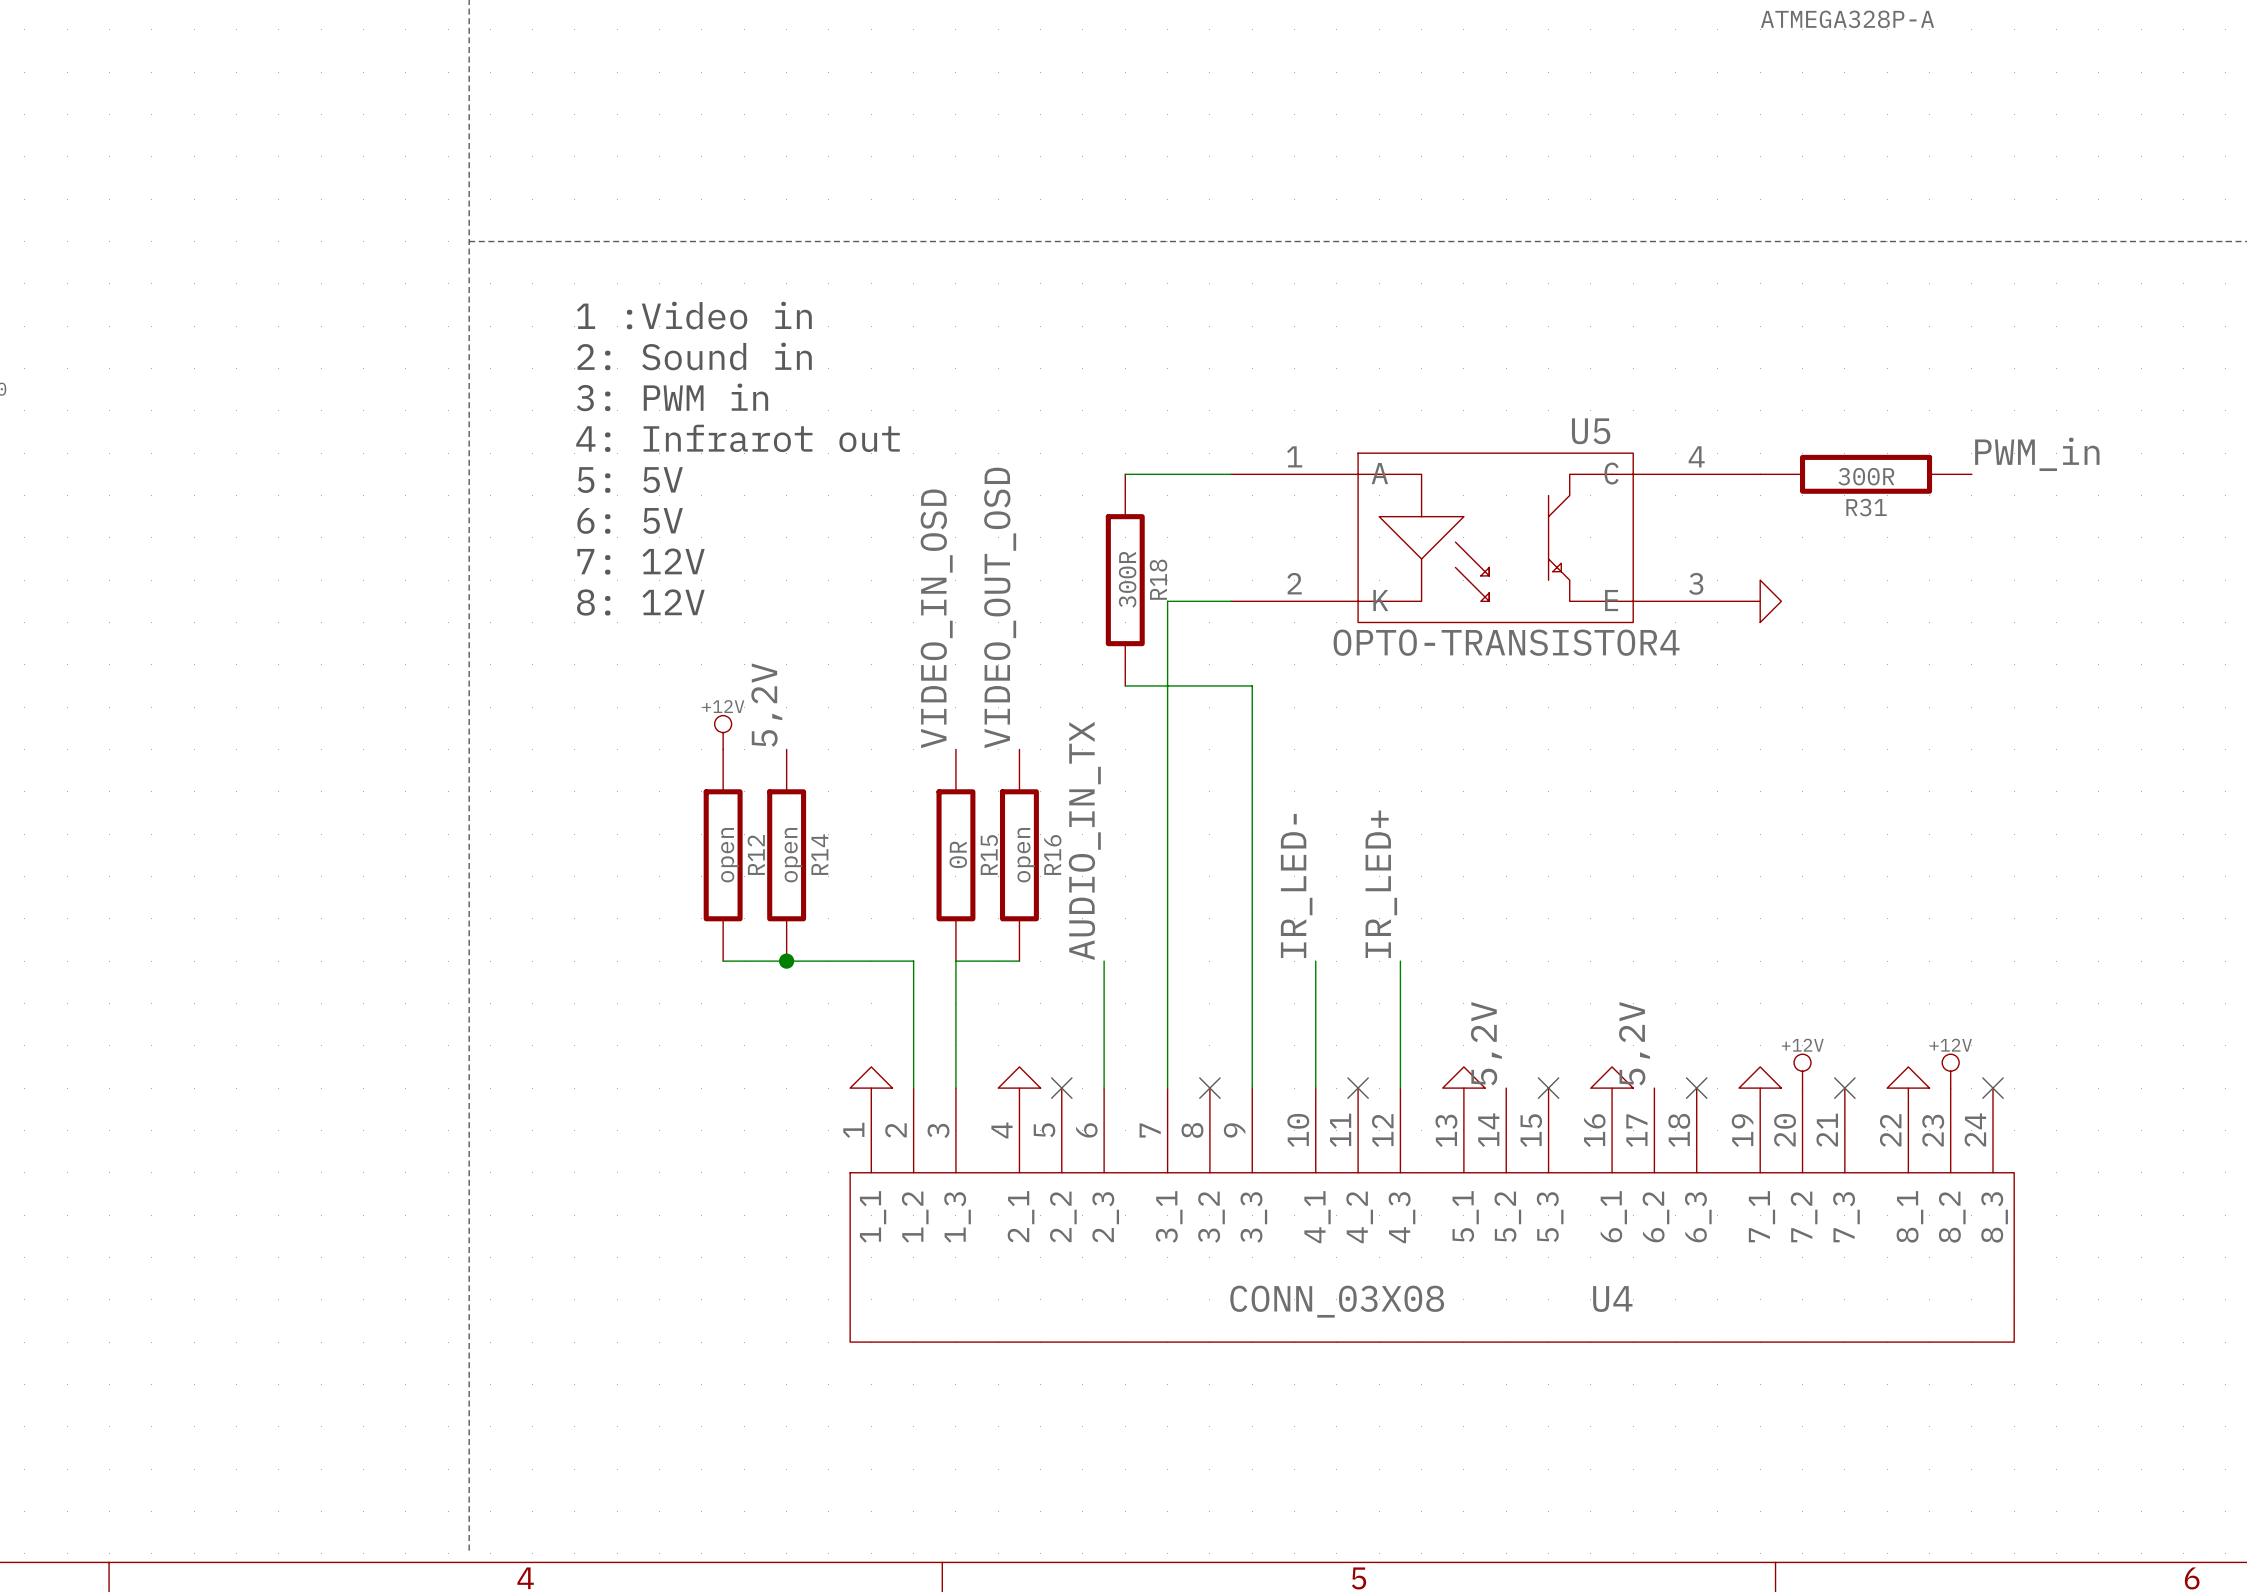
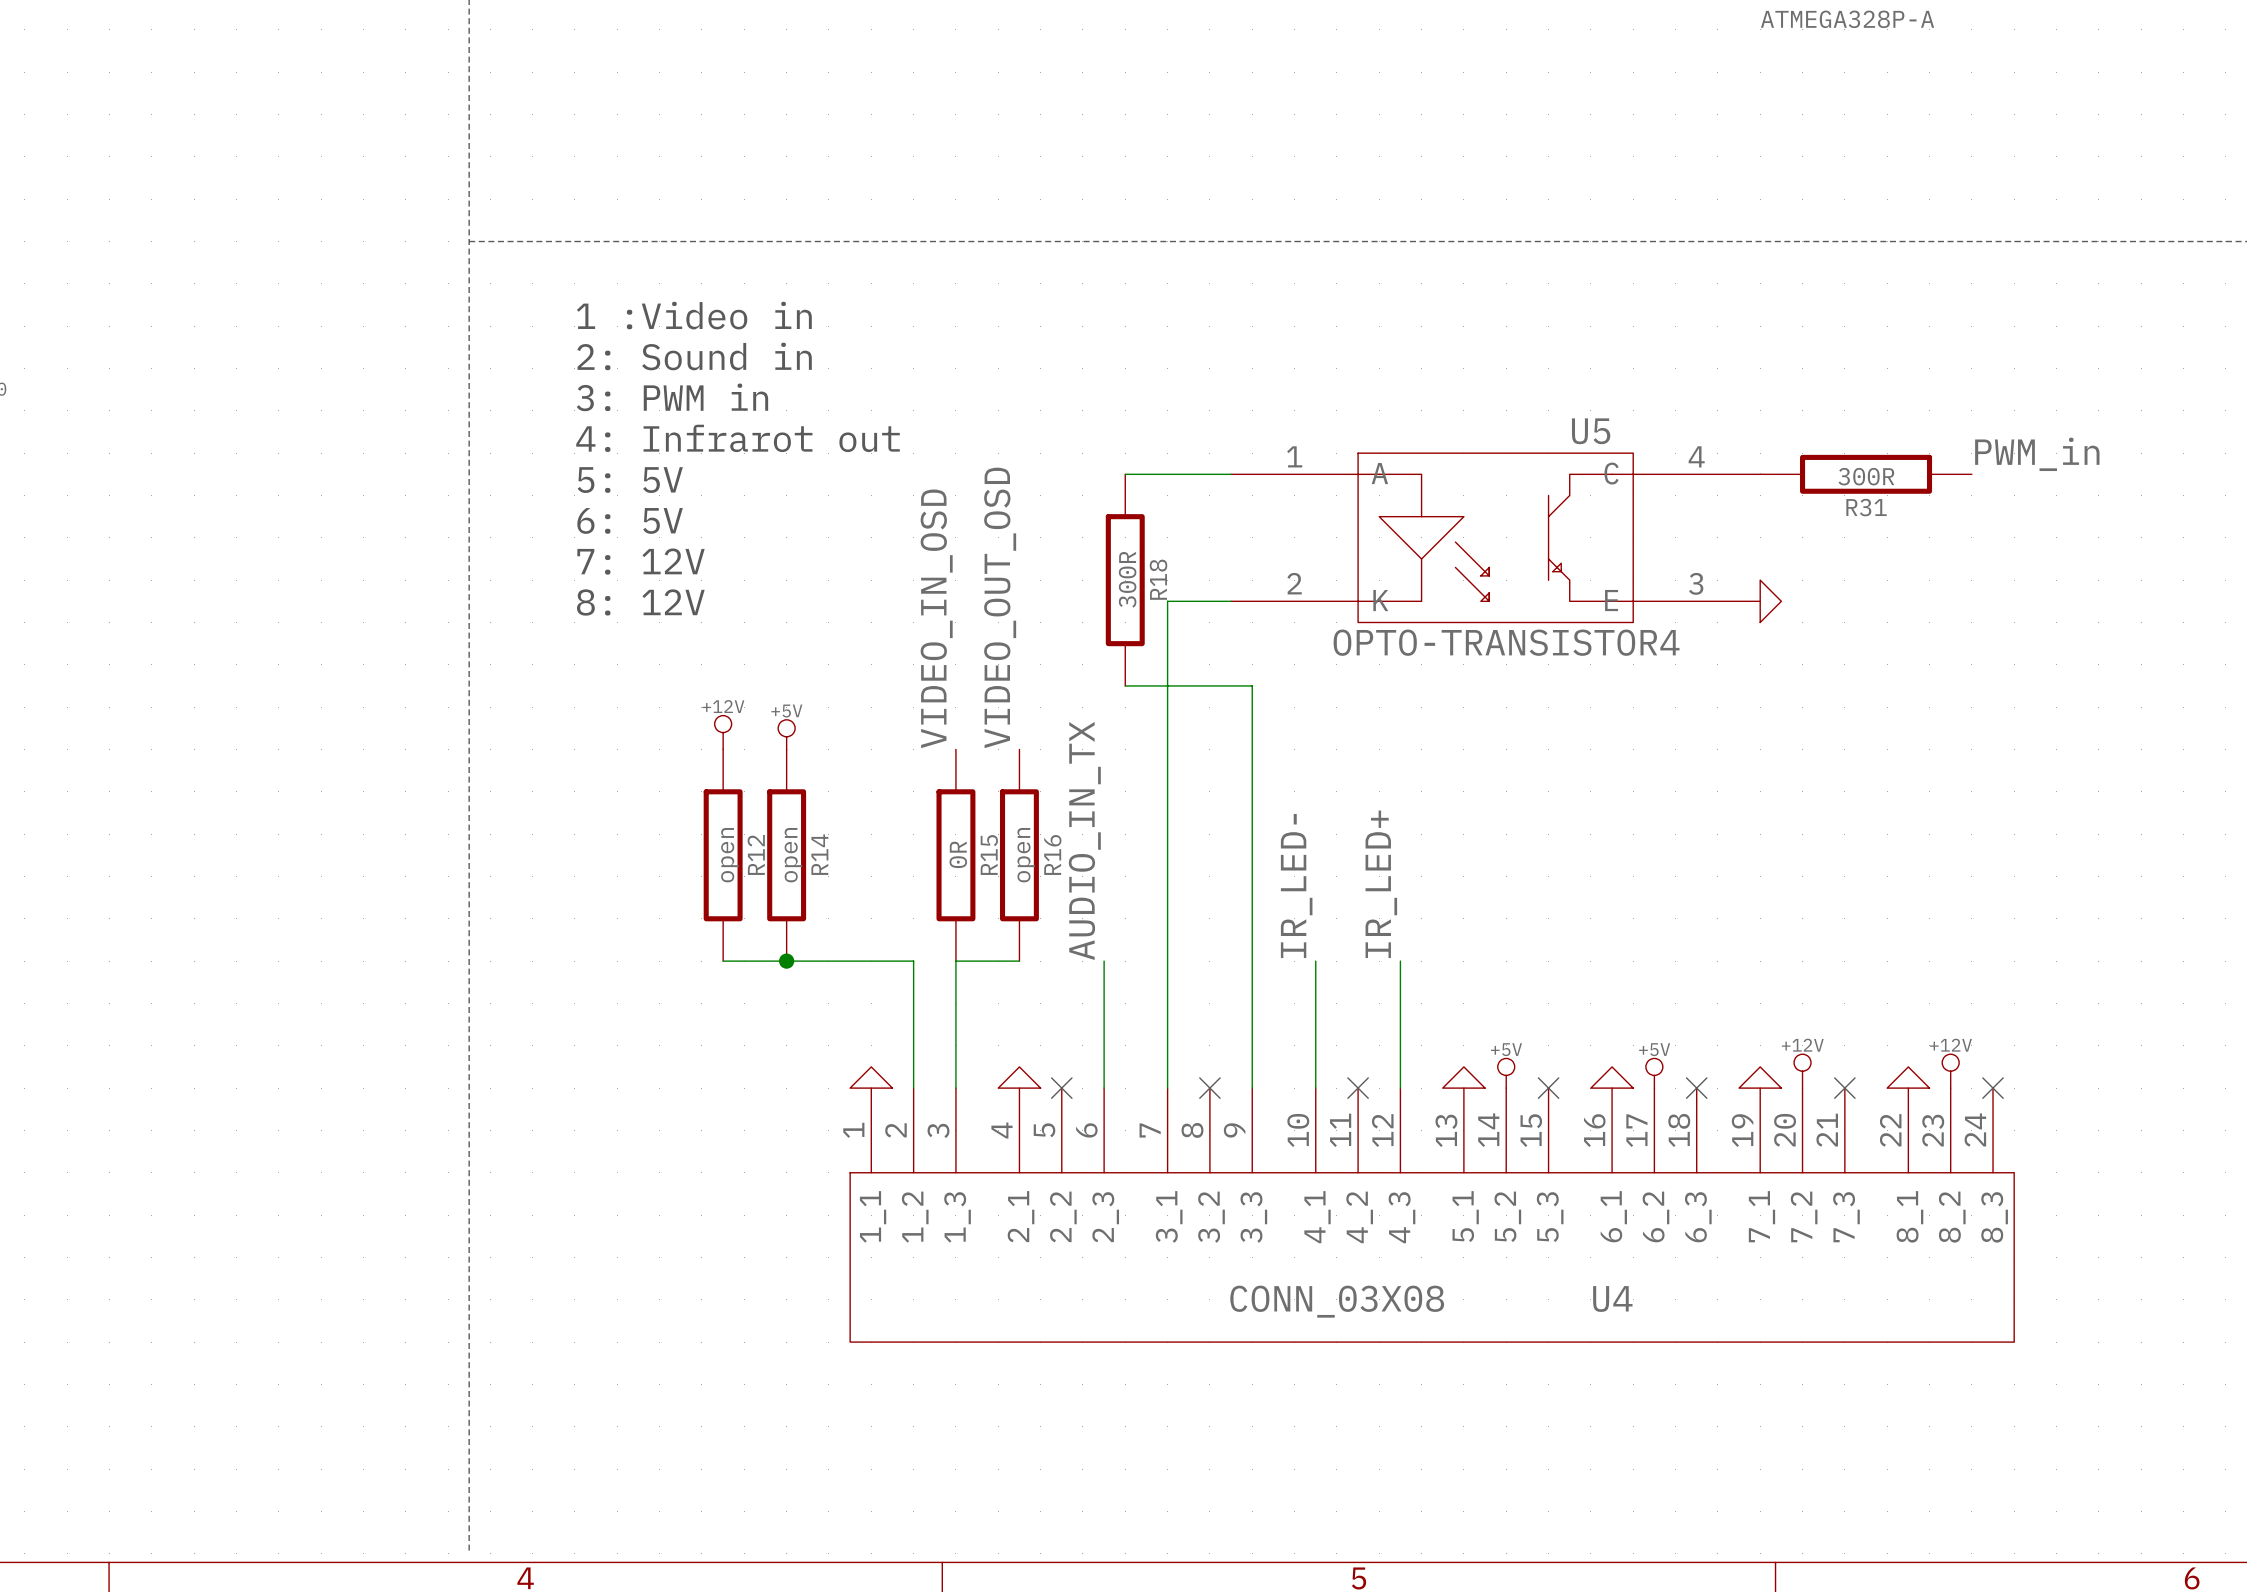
label: 5,2V (766, 705) -> none
power symbol: none -> +5V (786, 734)
label: 5,2V (1486, 1043) -> none
label: 5,2V (1634, 1043) -> none
power symbol: none -> +5V (1506, 1073)
power symbol: none -> +5V (1654, 1073)

